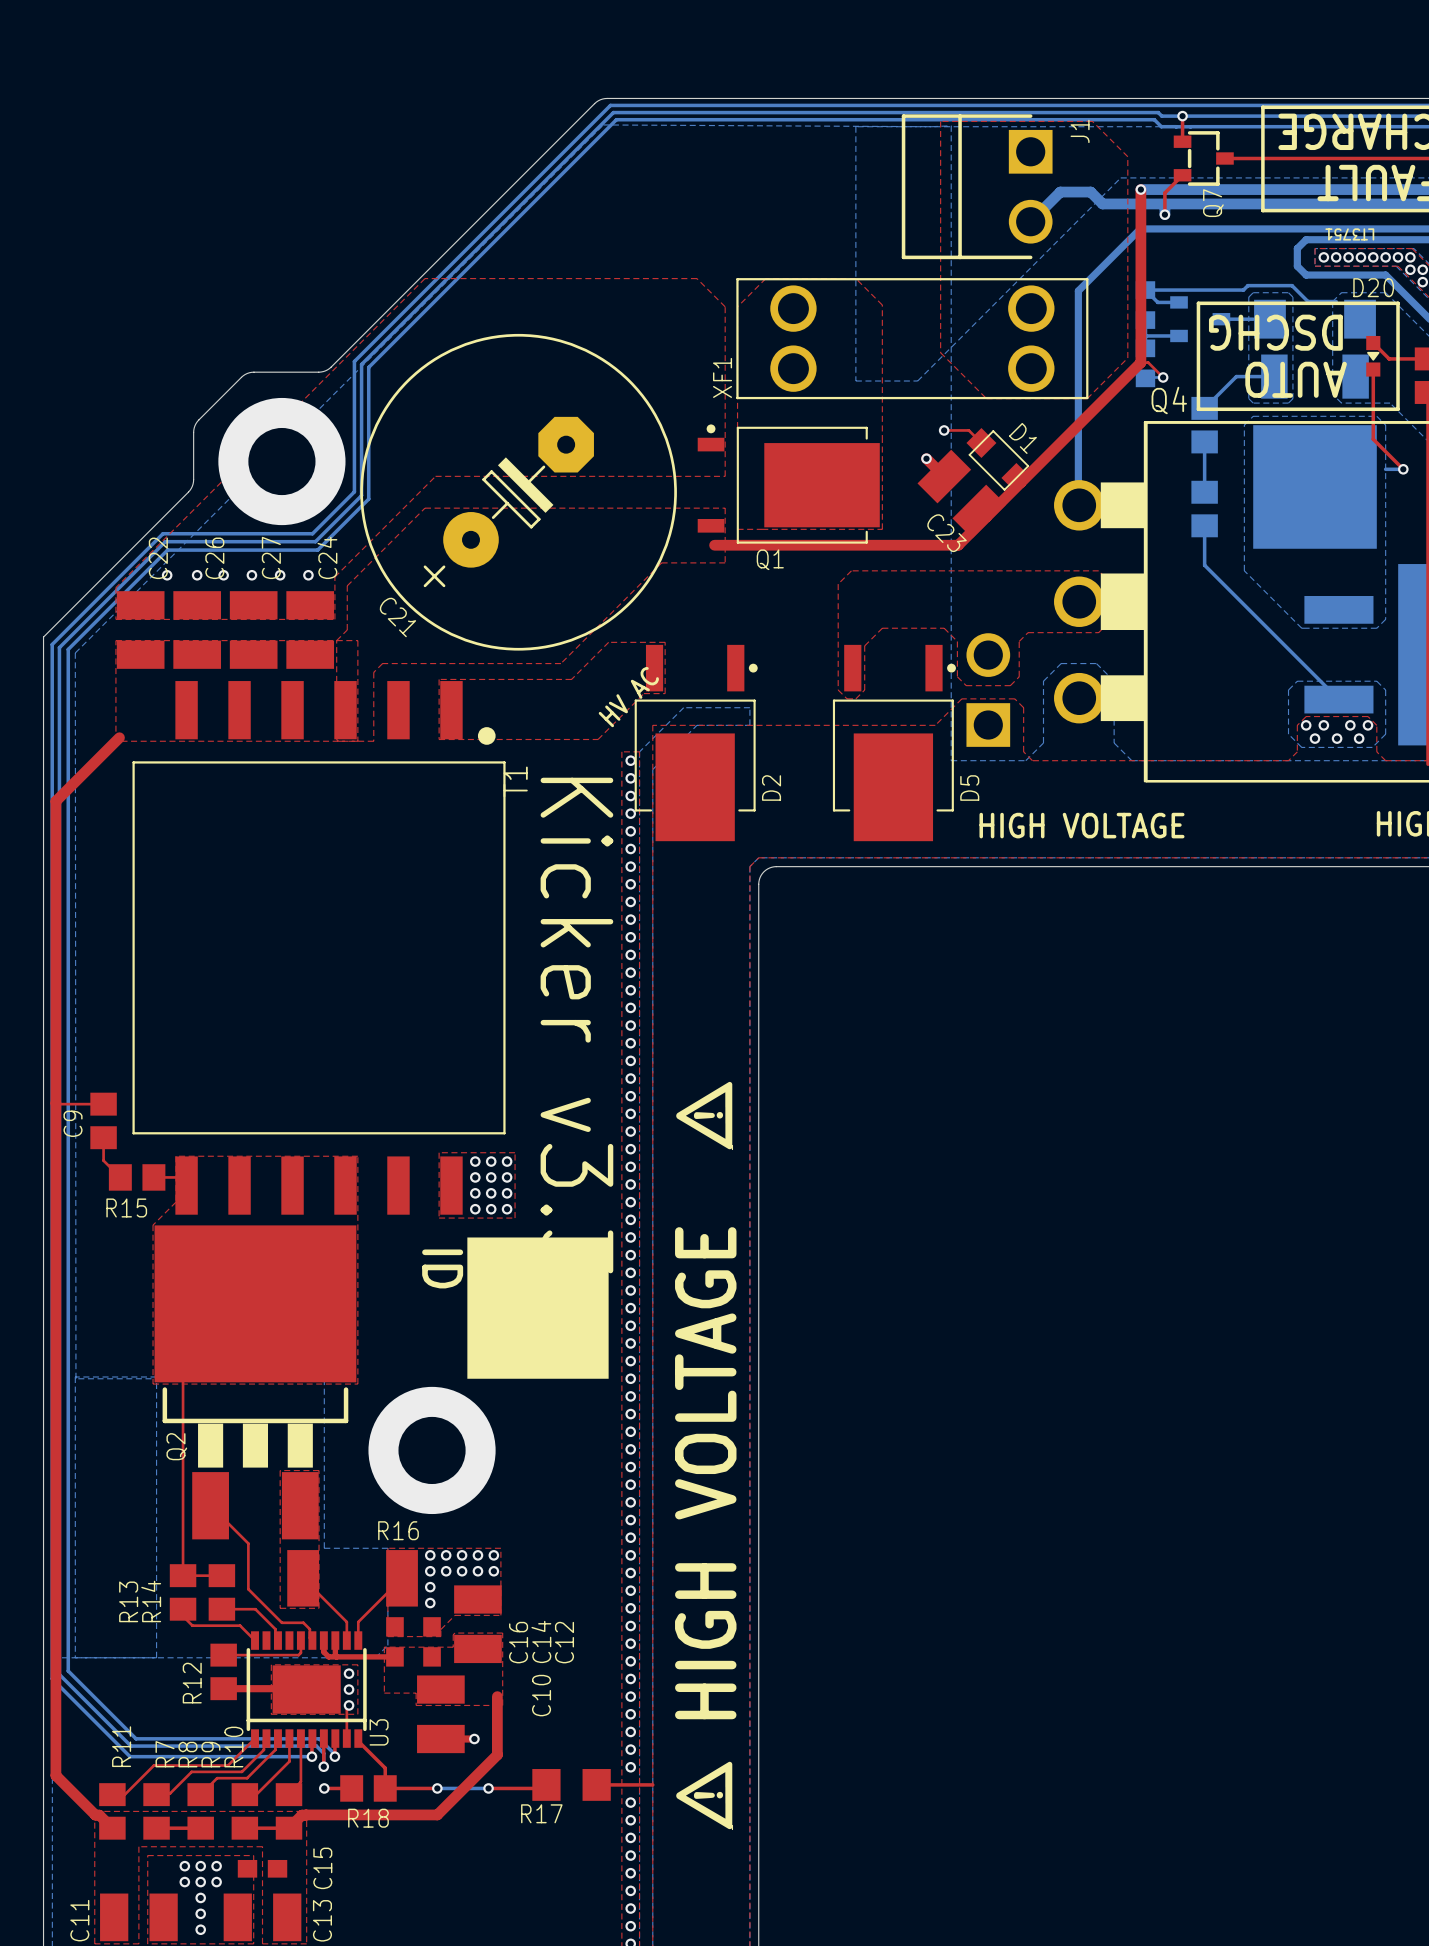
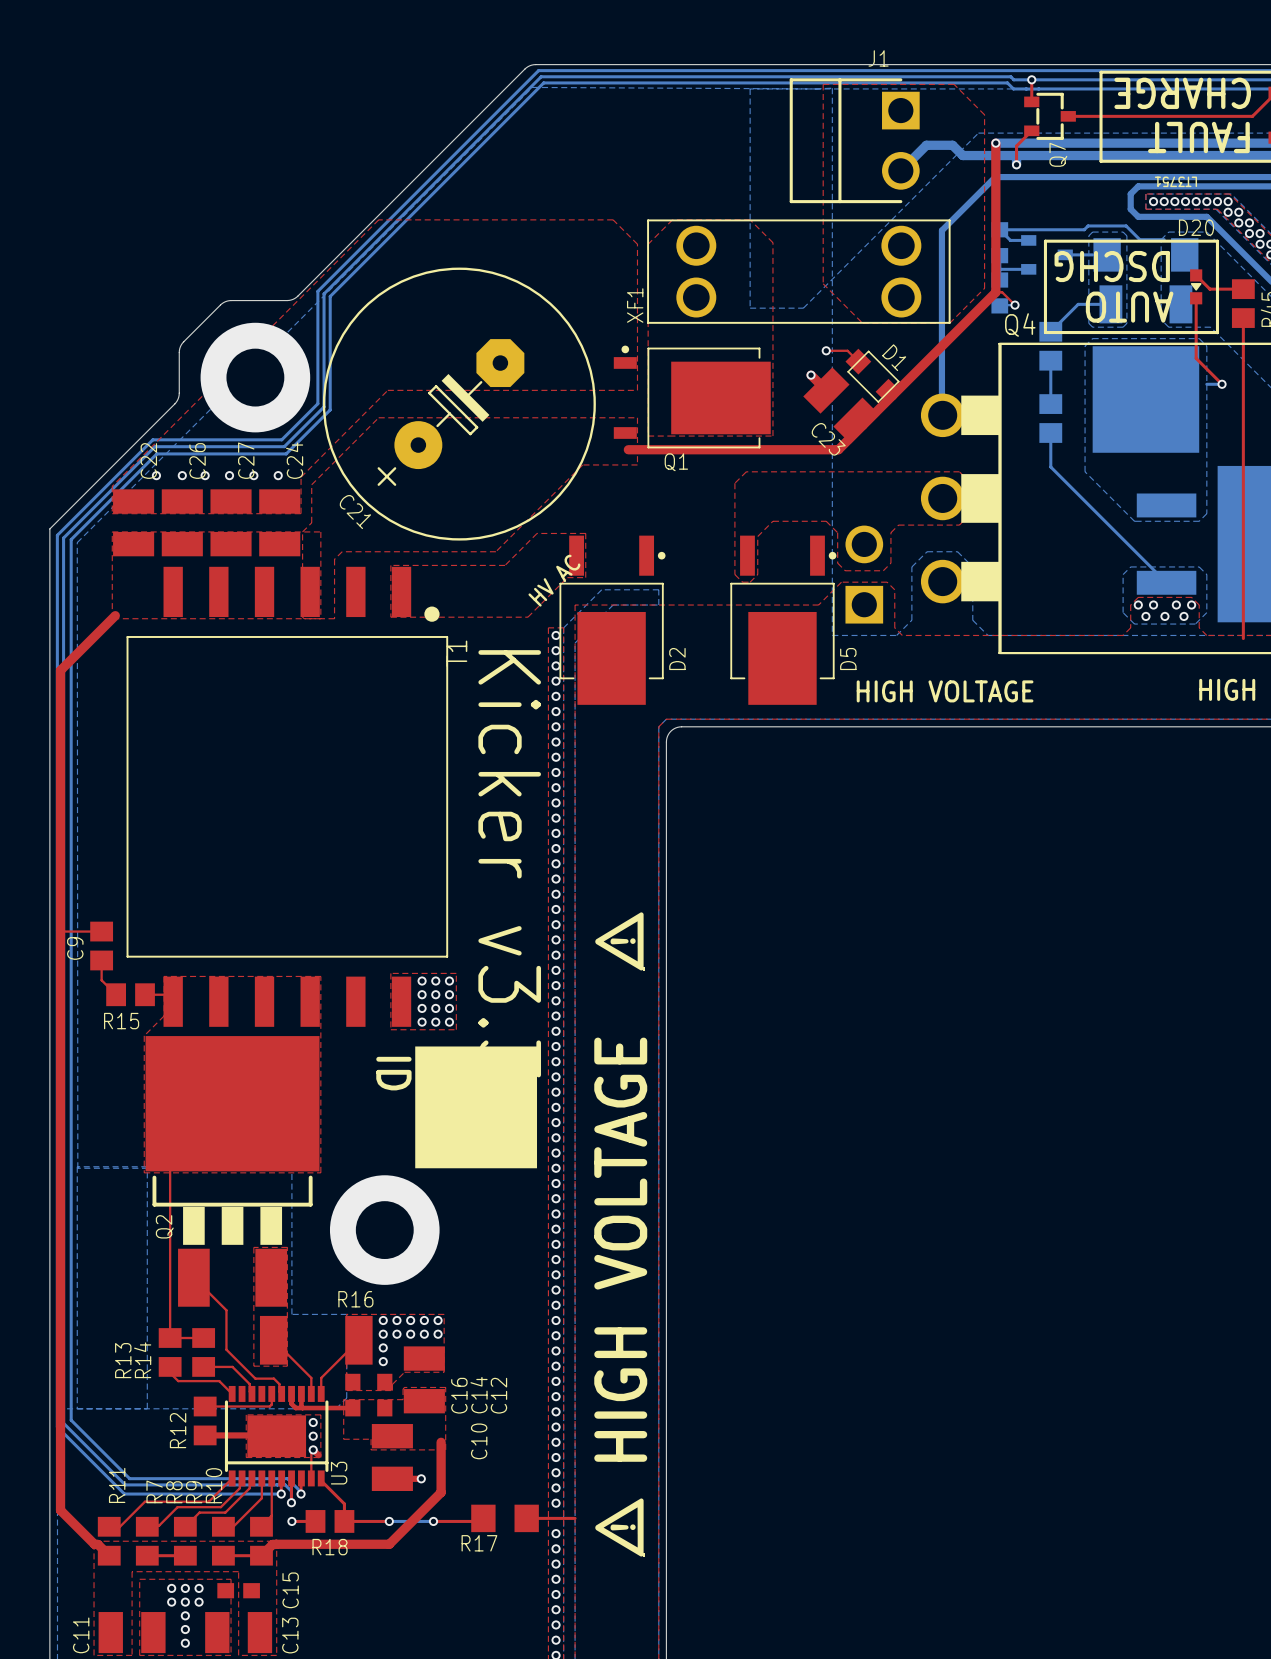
J1 name rotation: 0° (1080, 131) -> 90° clockwise (878, 58)
J1 name position: J1 (1080, 131) -> J1 (878, 58)
top track: none -> (313, 1449) (318, 1455)

